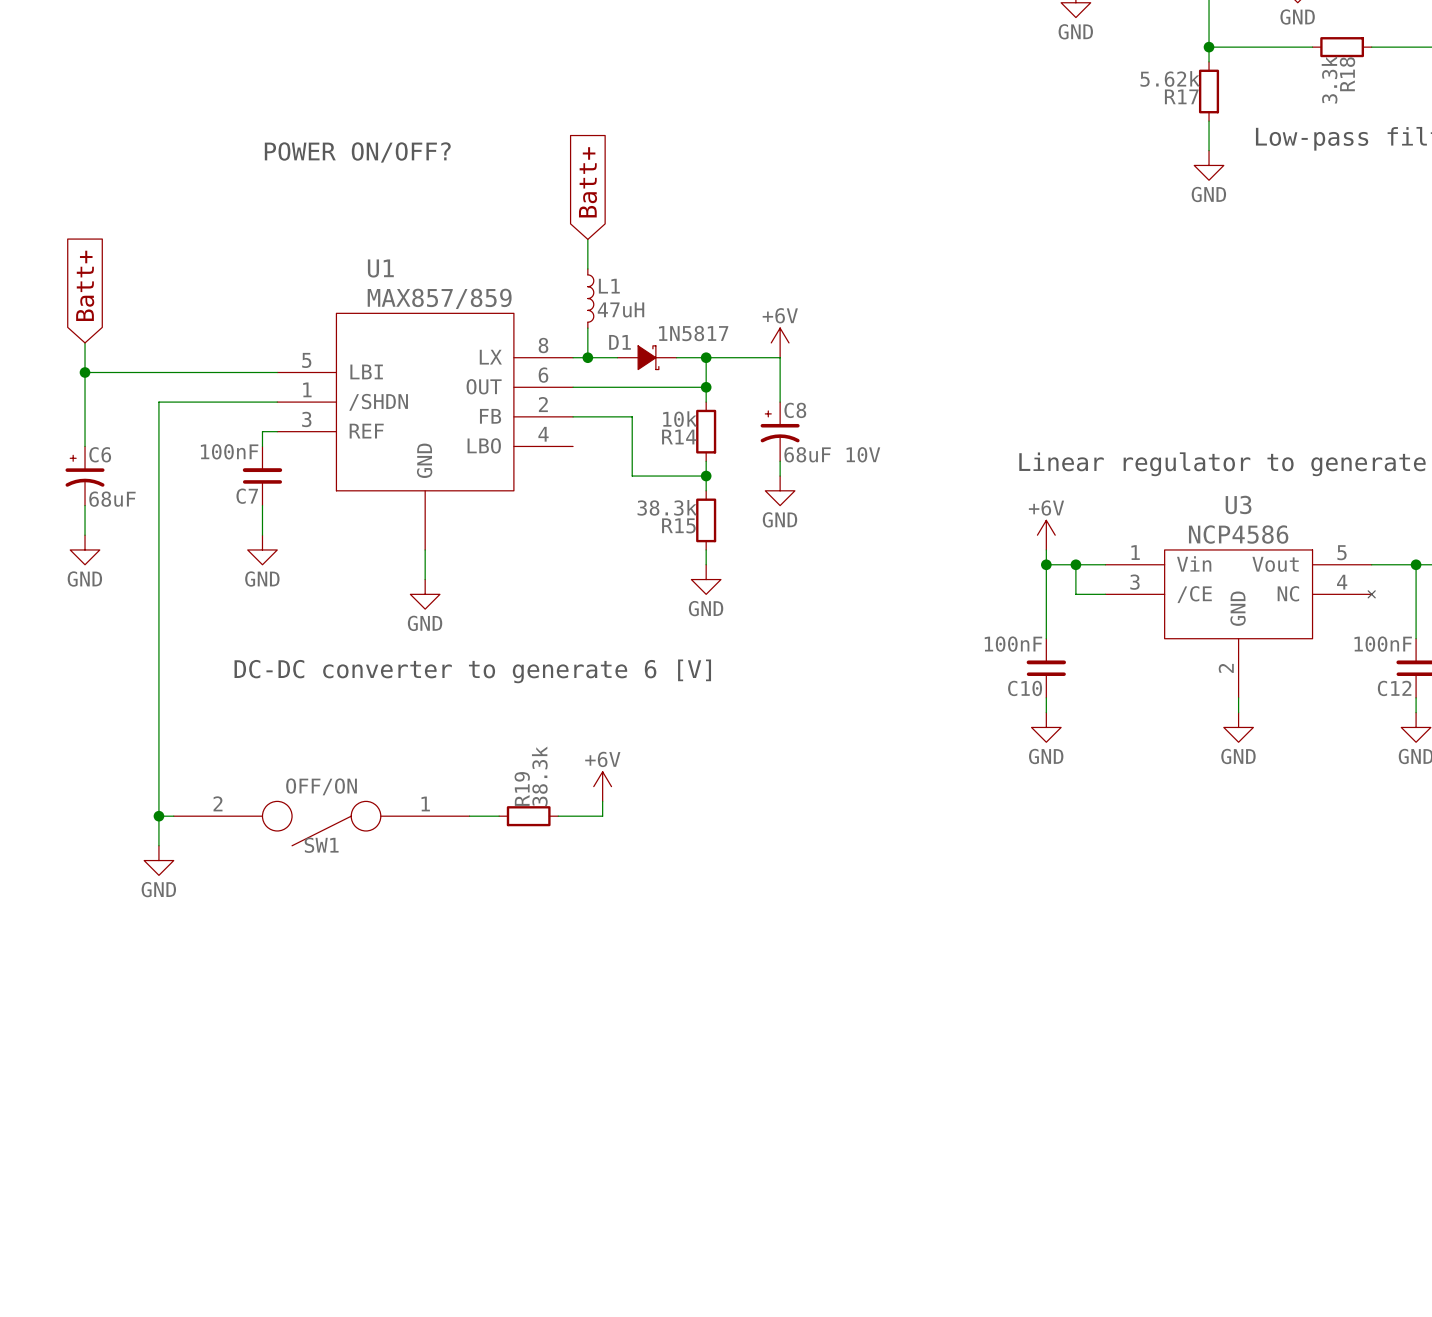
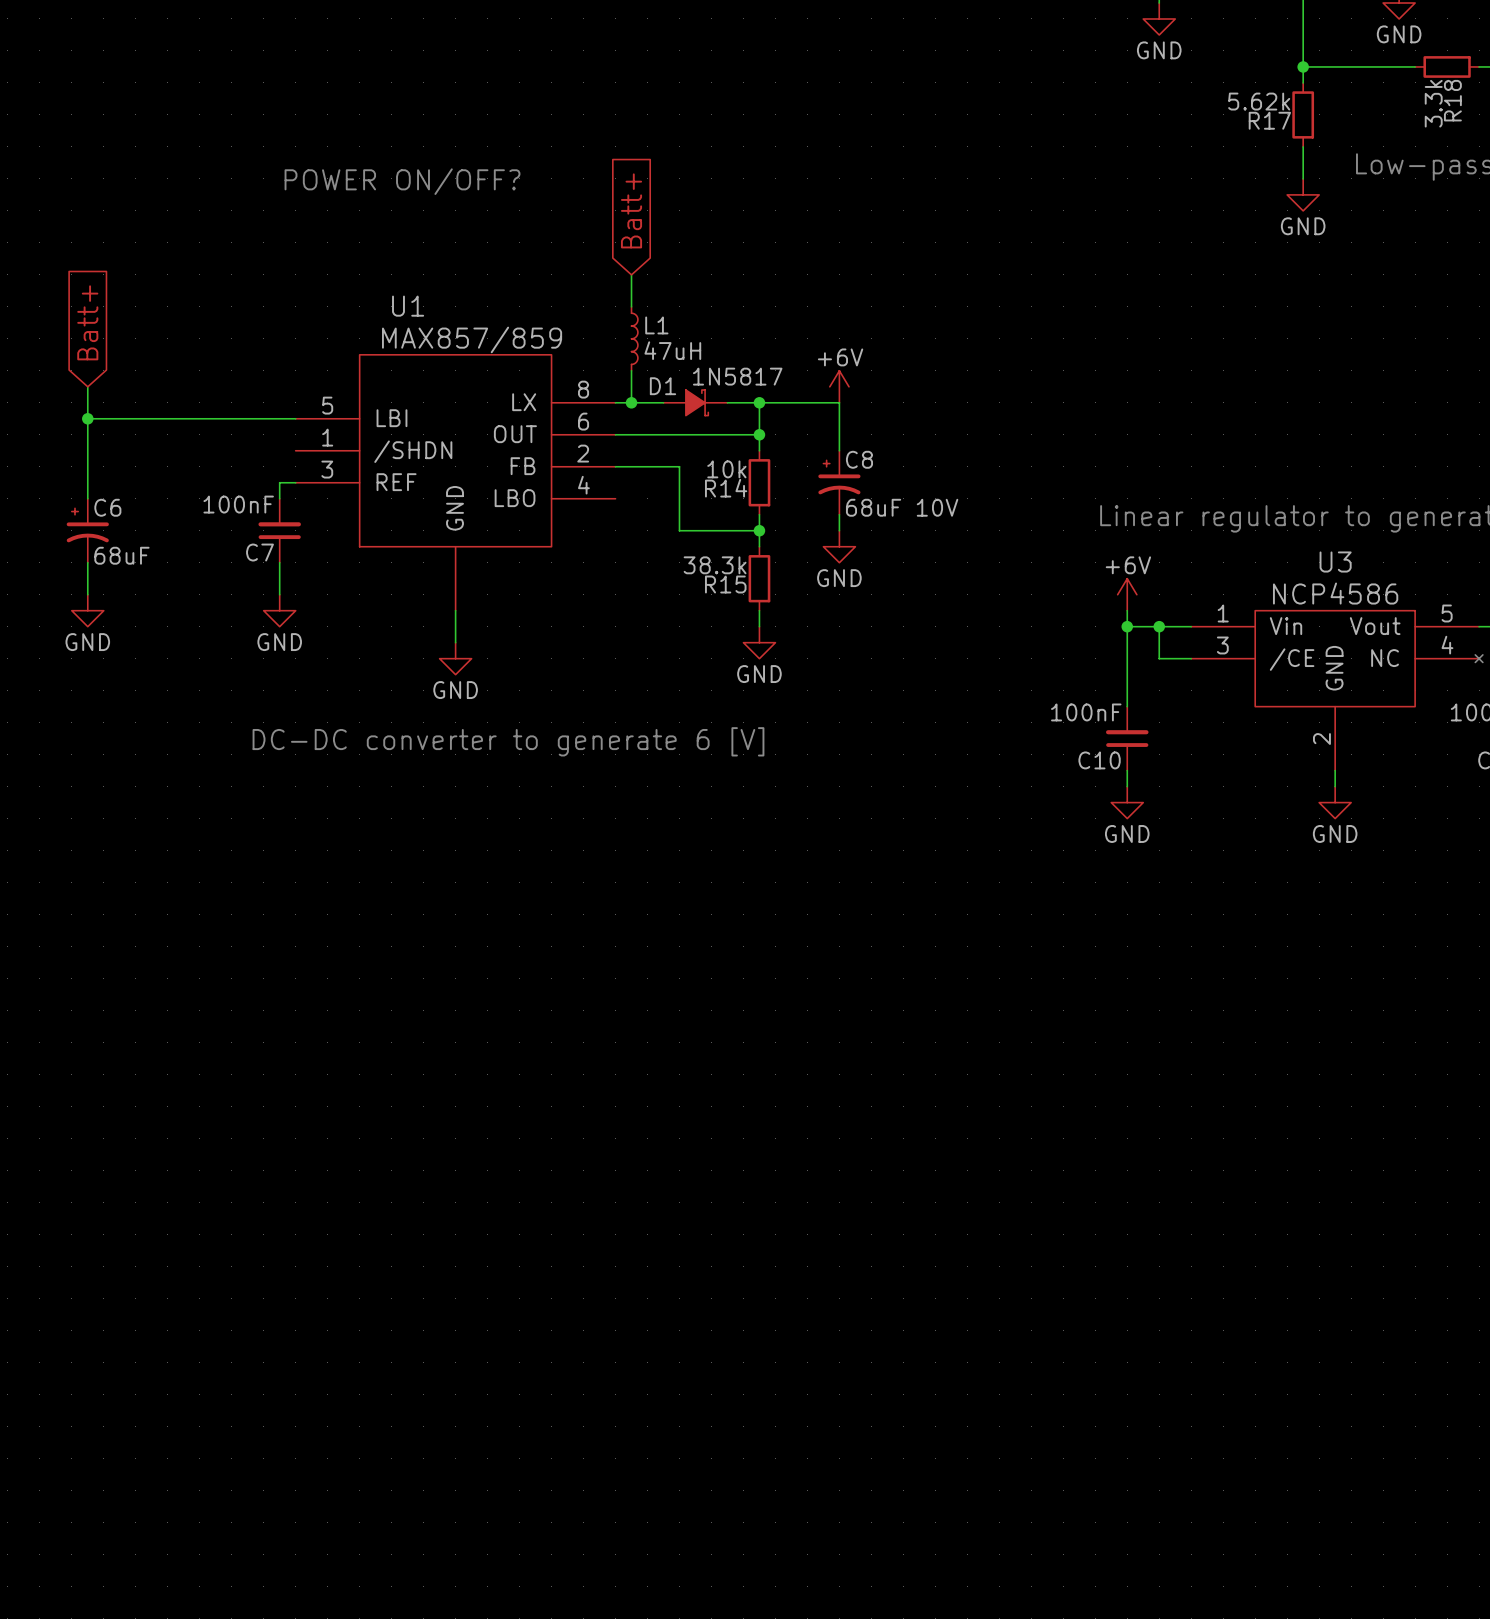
wire: (277, 402) (158, 402) (158, 845) -> none
power symbol: +6V (602, 786) -> none
wire: (602, 801) (602, 816) (558, 816) -> none
wire: (158, 816) (173, 816) -> none
junction: (158, 816) -> none
wire: (469, 816) (499, 816) -> none
R19: 38.3k (528, 816) -> none
SW1: OFF/ON (321, 823) -> none
power symbol: GND (158, 860) -> none

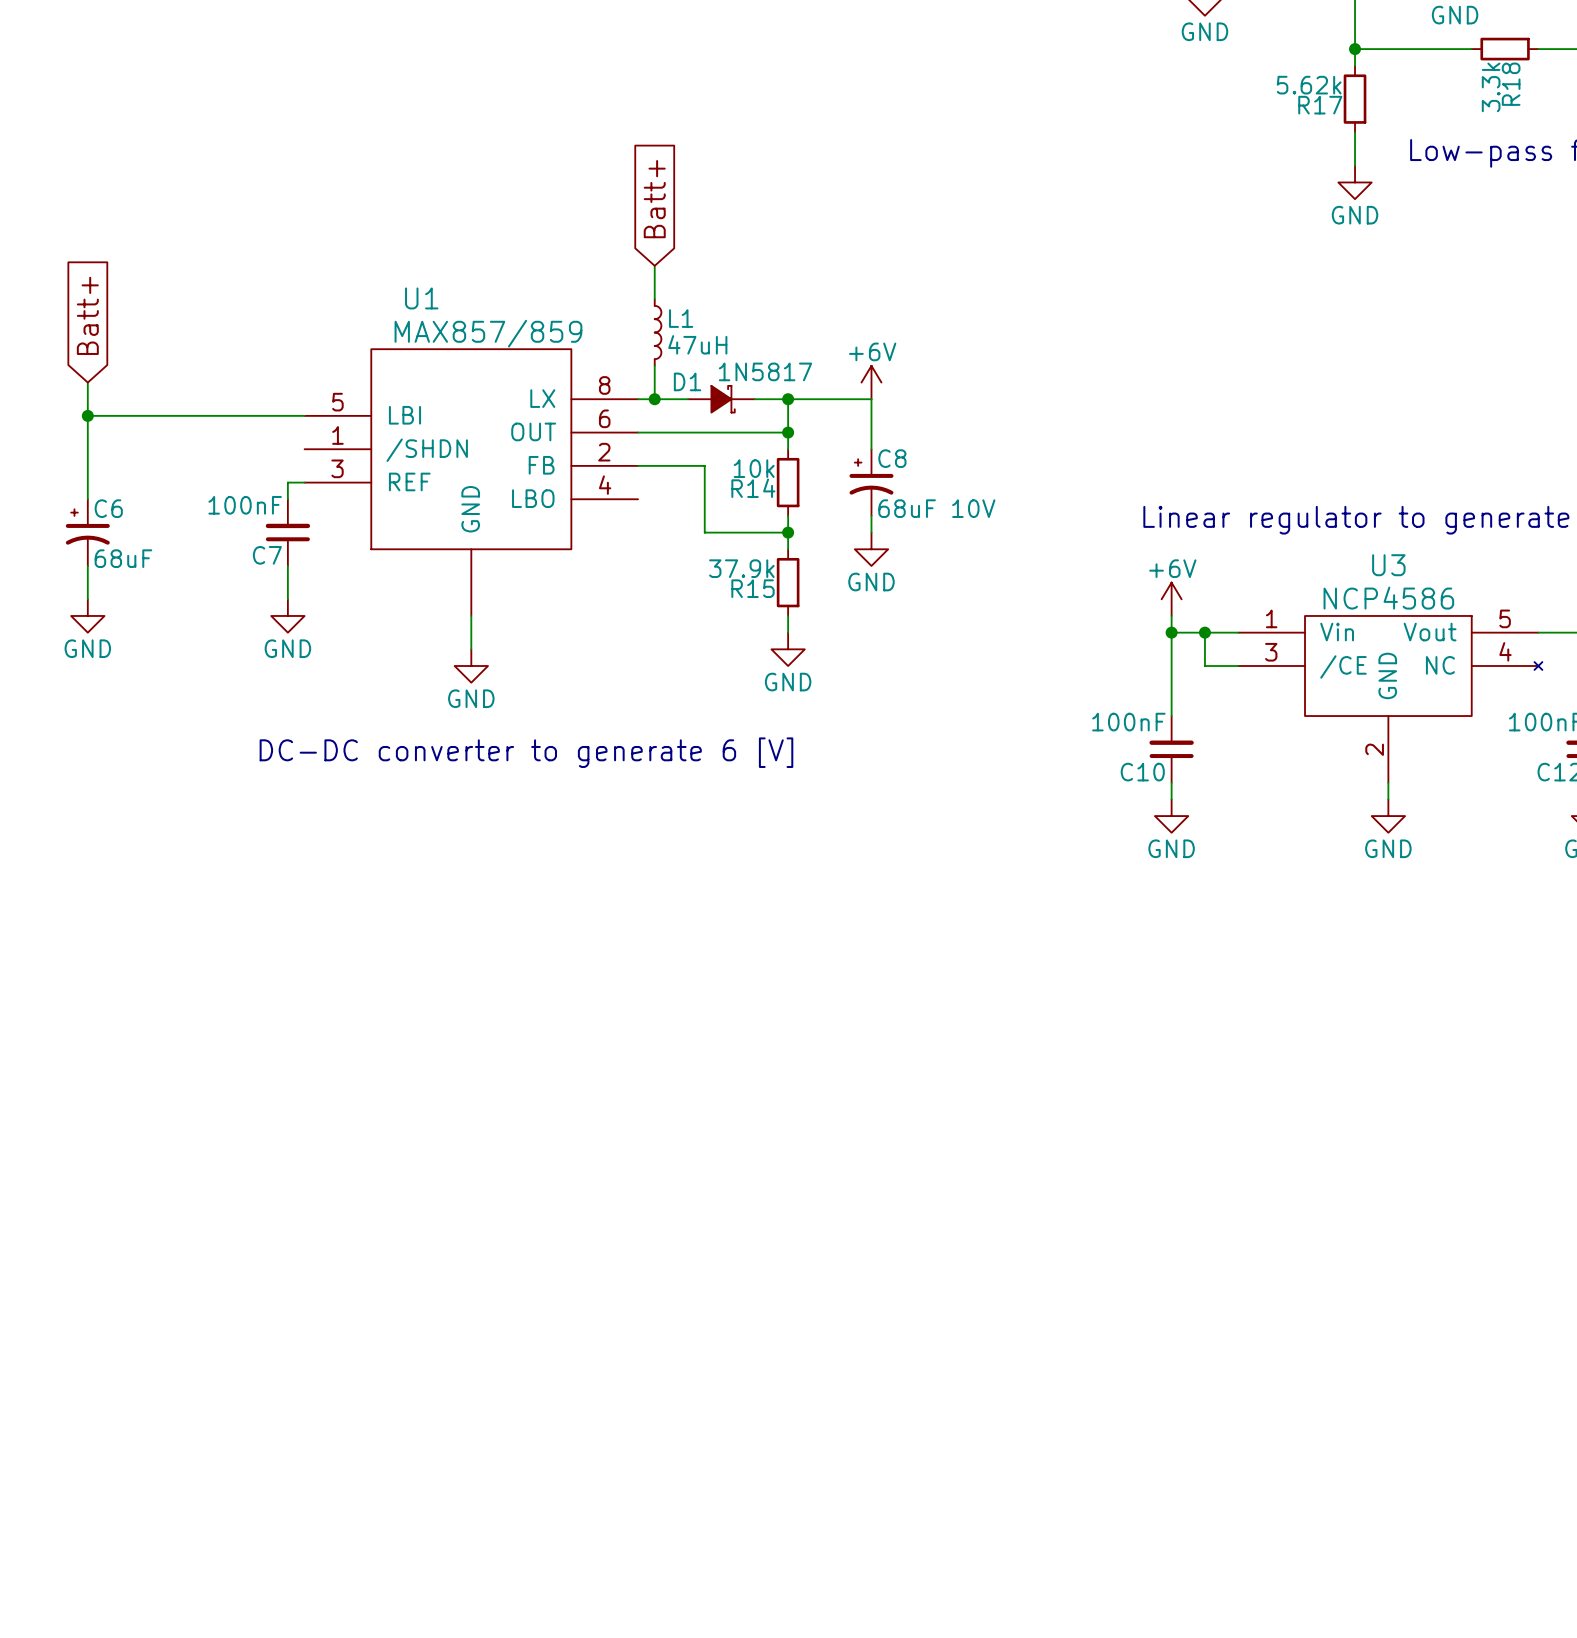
text: POWER ON/OFF? (402, 181) -> none
R15 value: 38.3k (715, 565) -> 37.9k (741, 568)

